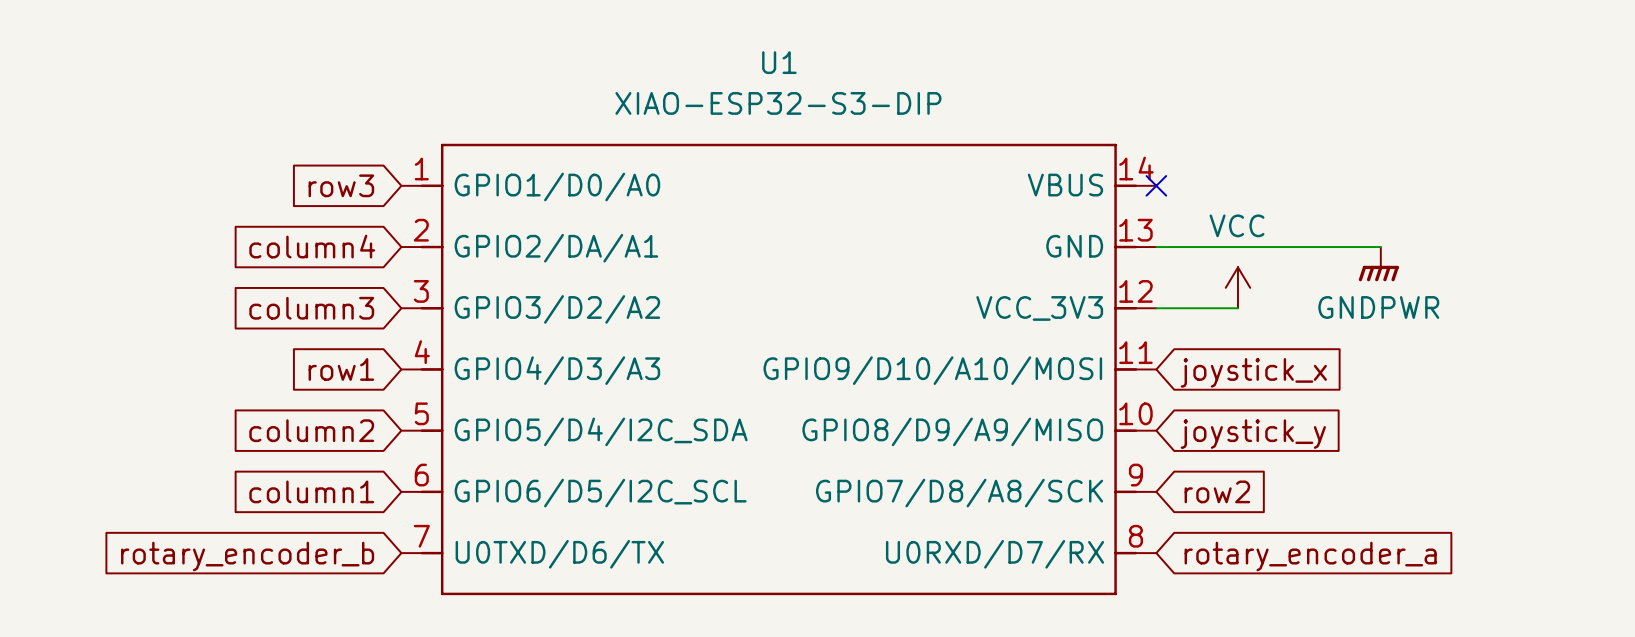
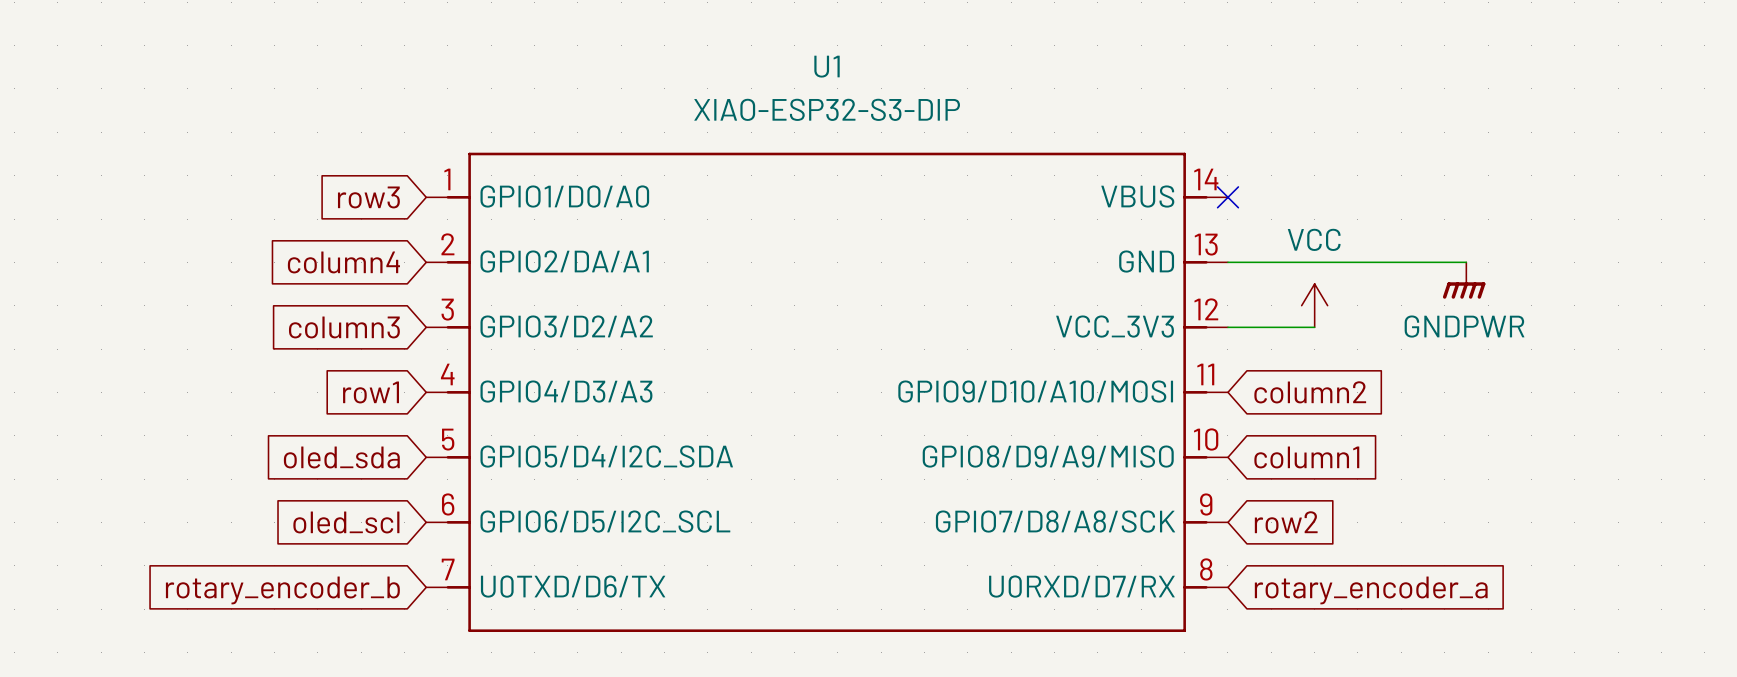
global label: joystick_x (1253, 372) -> column2 (1310, 392)
global label: column2 (311, 430) -> oled_sda (341, 457)
global label: joystick_y (1253, 434) -> column1 (1306, 457)
global label: column1 (311, 491) -> oled_scl (346, 522)

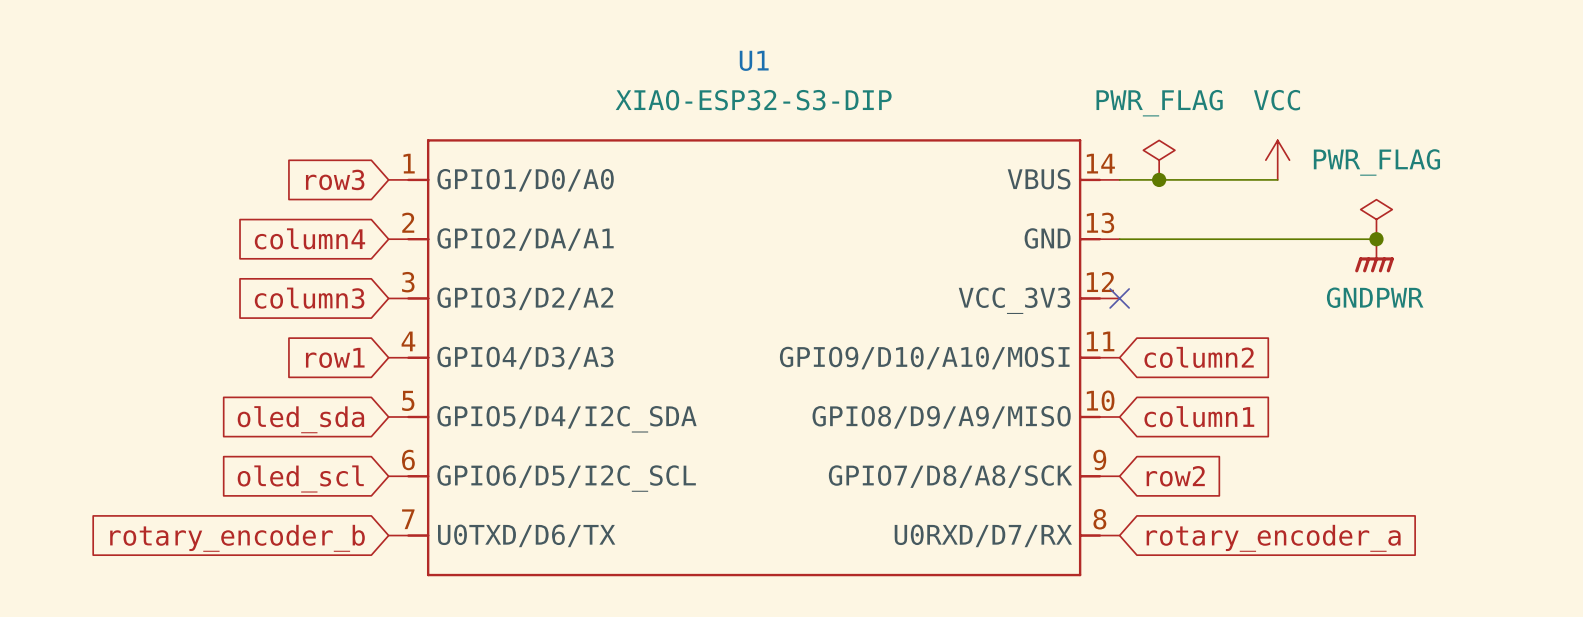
power symbol: none -> PWR_FLAG (1159, 160)
wire: none -> (1119, 179) (1277, 179)
no-connect mark: (1227, 197) -> none
junction: none -> (1159, 179)
power symbol: none -> PWR_FLAG (1376, 219)
wire: none -> (1336, 239) (1376, 239)
junction: none -> (1376, 239)
power symbol position: GNDPWR (1464, 280) -> GNDPWR (1374, 255)
power symbol position: VCC (1314, 305) -> VCC (1277, 160)
wire: (1227, 327) (1314, 327) -> none
no-connect mark: none -> (1119, 298)

